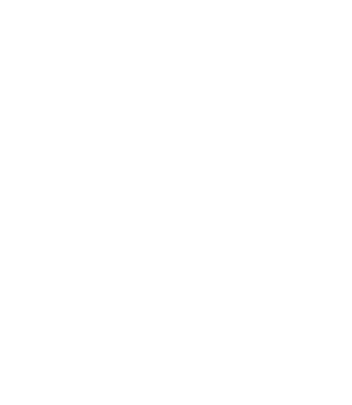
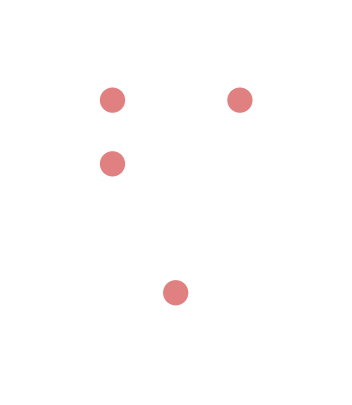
part: none -> (112, 100)
part: none -> (239, 100)
part: none -> (112, 163)
part: none -> (175, 292)

